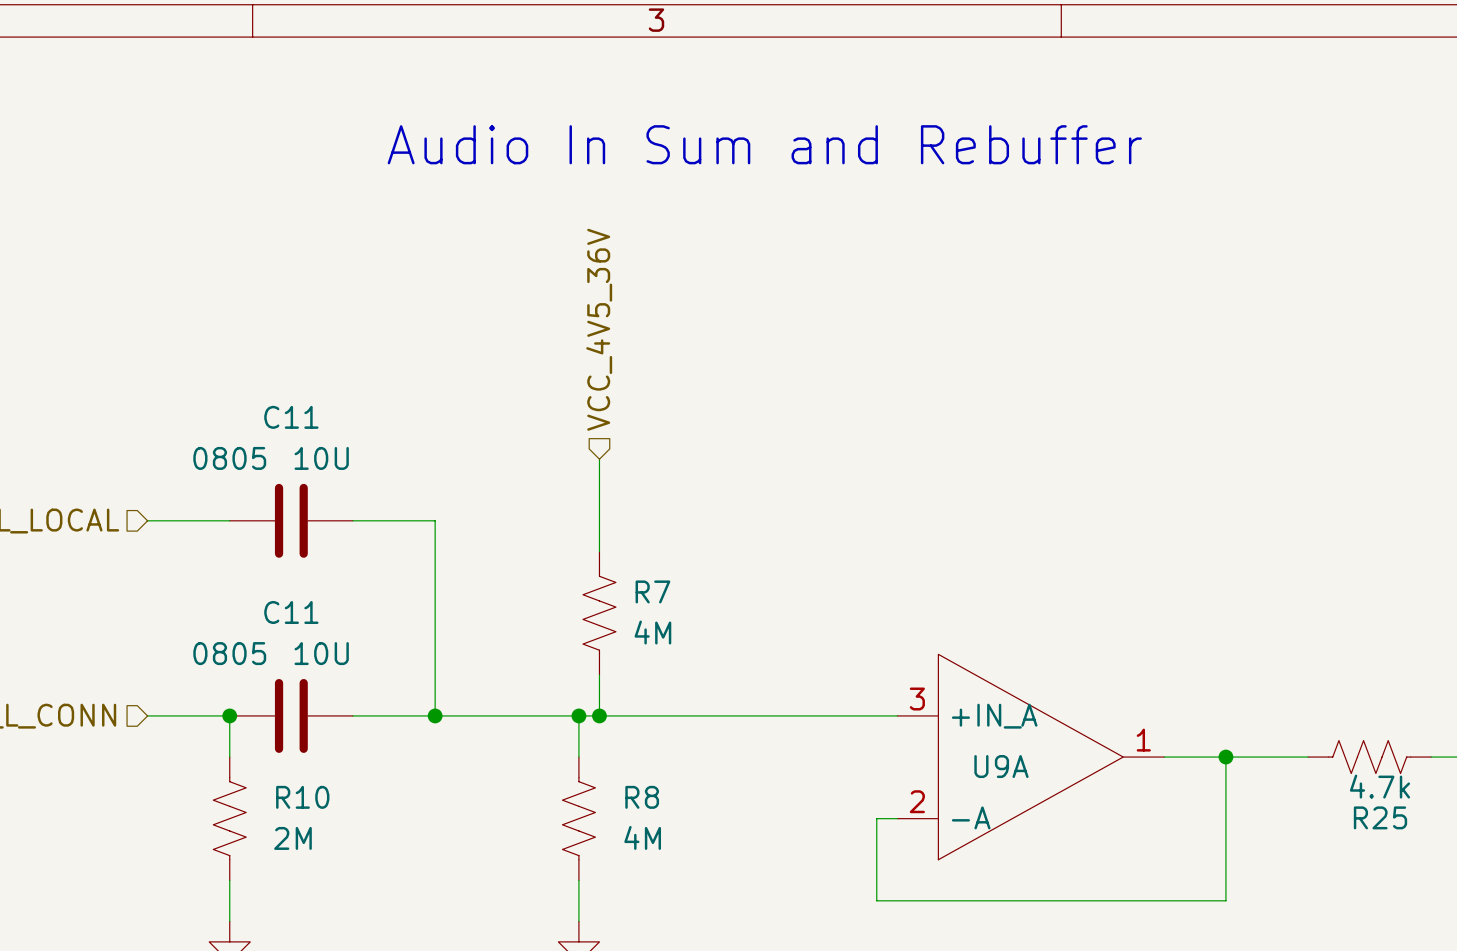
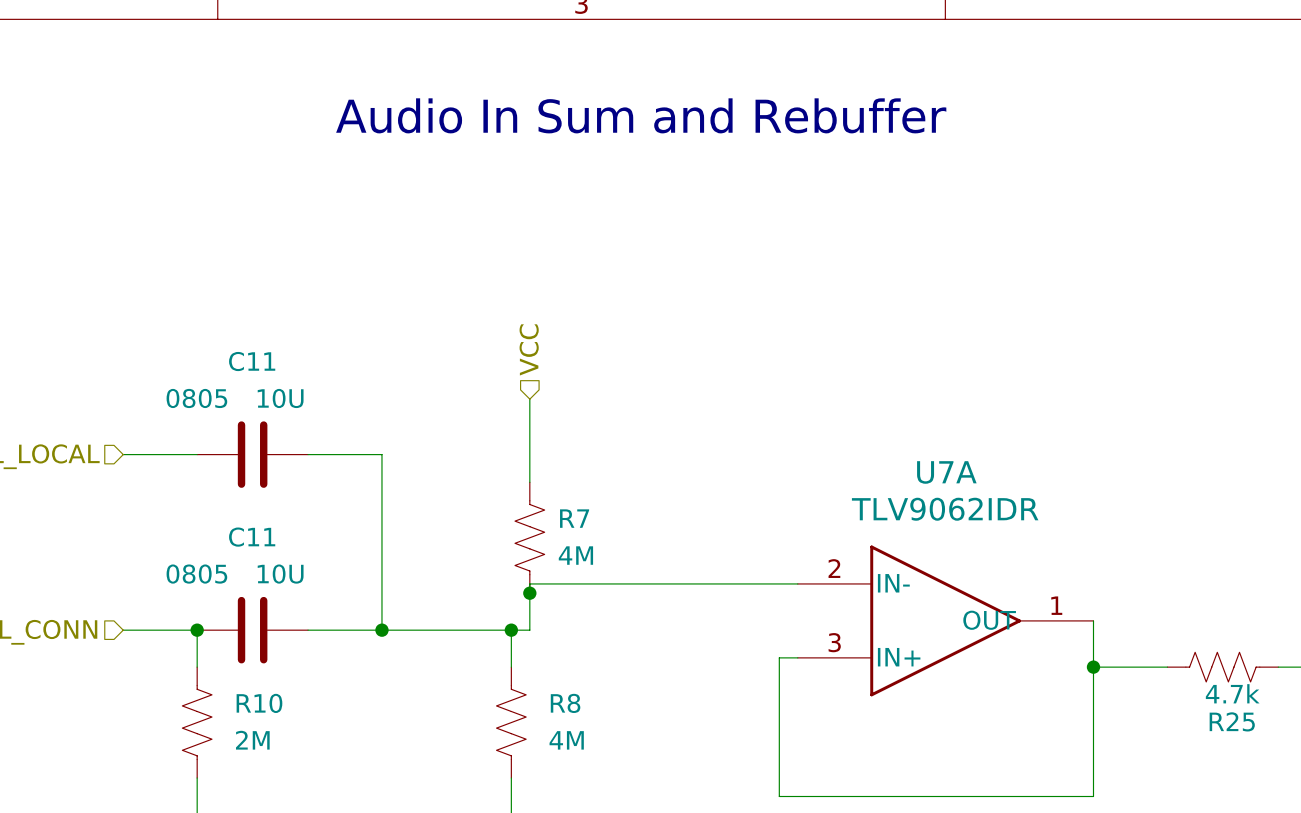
hierarchical label: VCC_4V5_36V (599, 329) -> VCC (529, 349)
wire: none -> (797, 583) (529, 583) (529, 593)
U7A: none -> TLV9062IDR (945, 620)
wire: (599, 715) (897, 715) -> none
junction position: (599, 715) -> (529, 593)
U9A: (1030, 757) -> none
wire: (1164, 757) (1225, 757) -> (1093, 620) (1093, 667)
wire: (876, 818) (897, 818) -> (779, 722) (779, 657) (797, 657)

